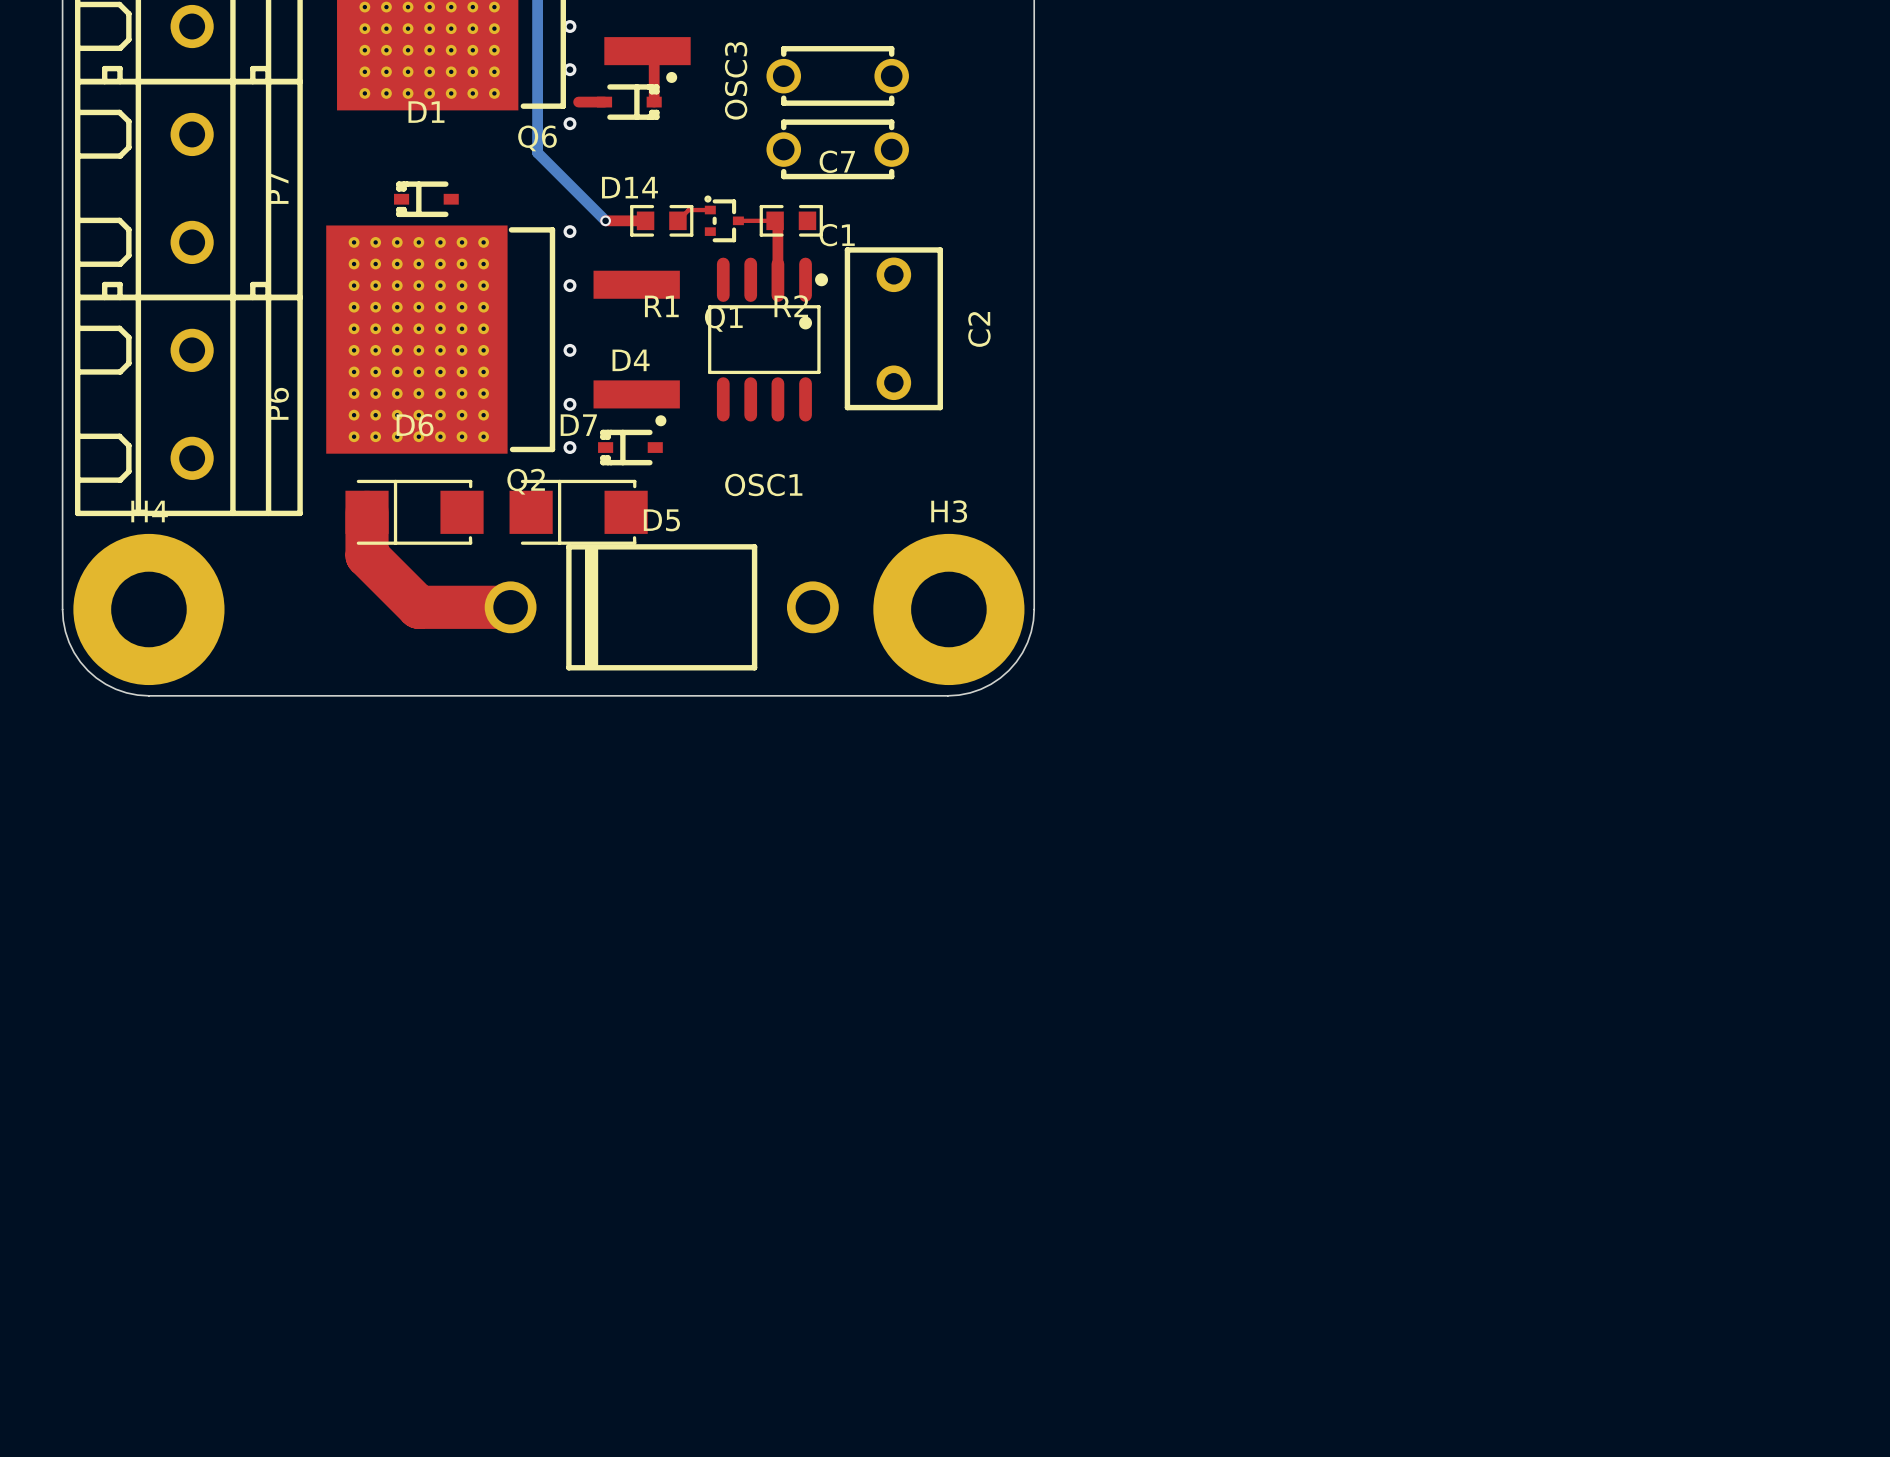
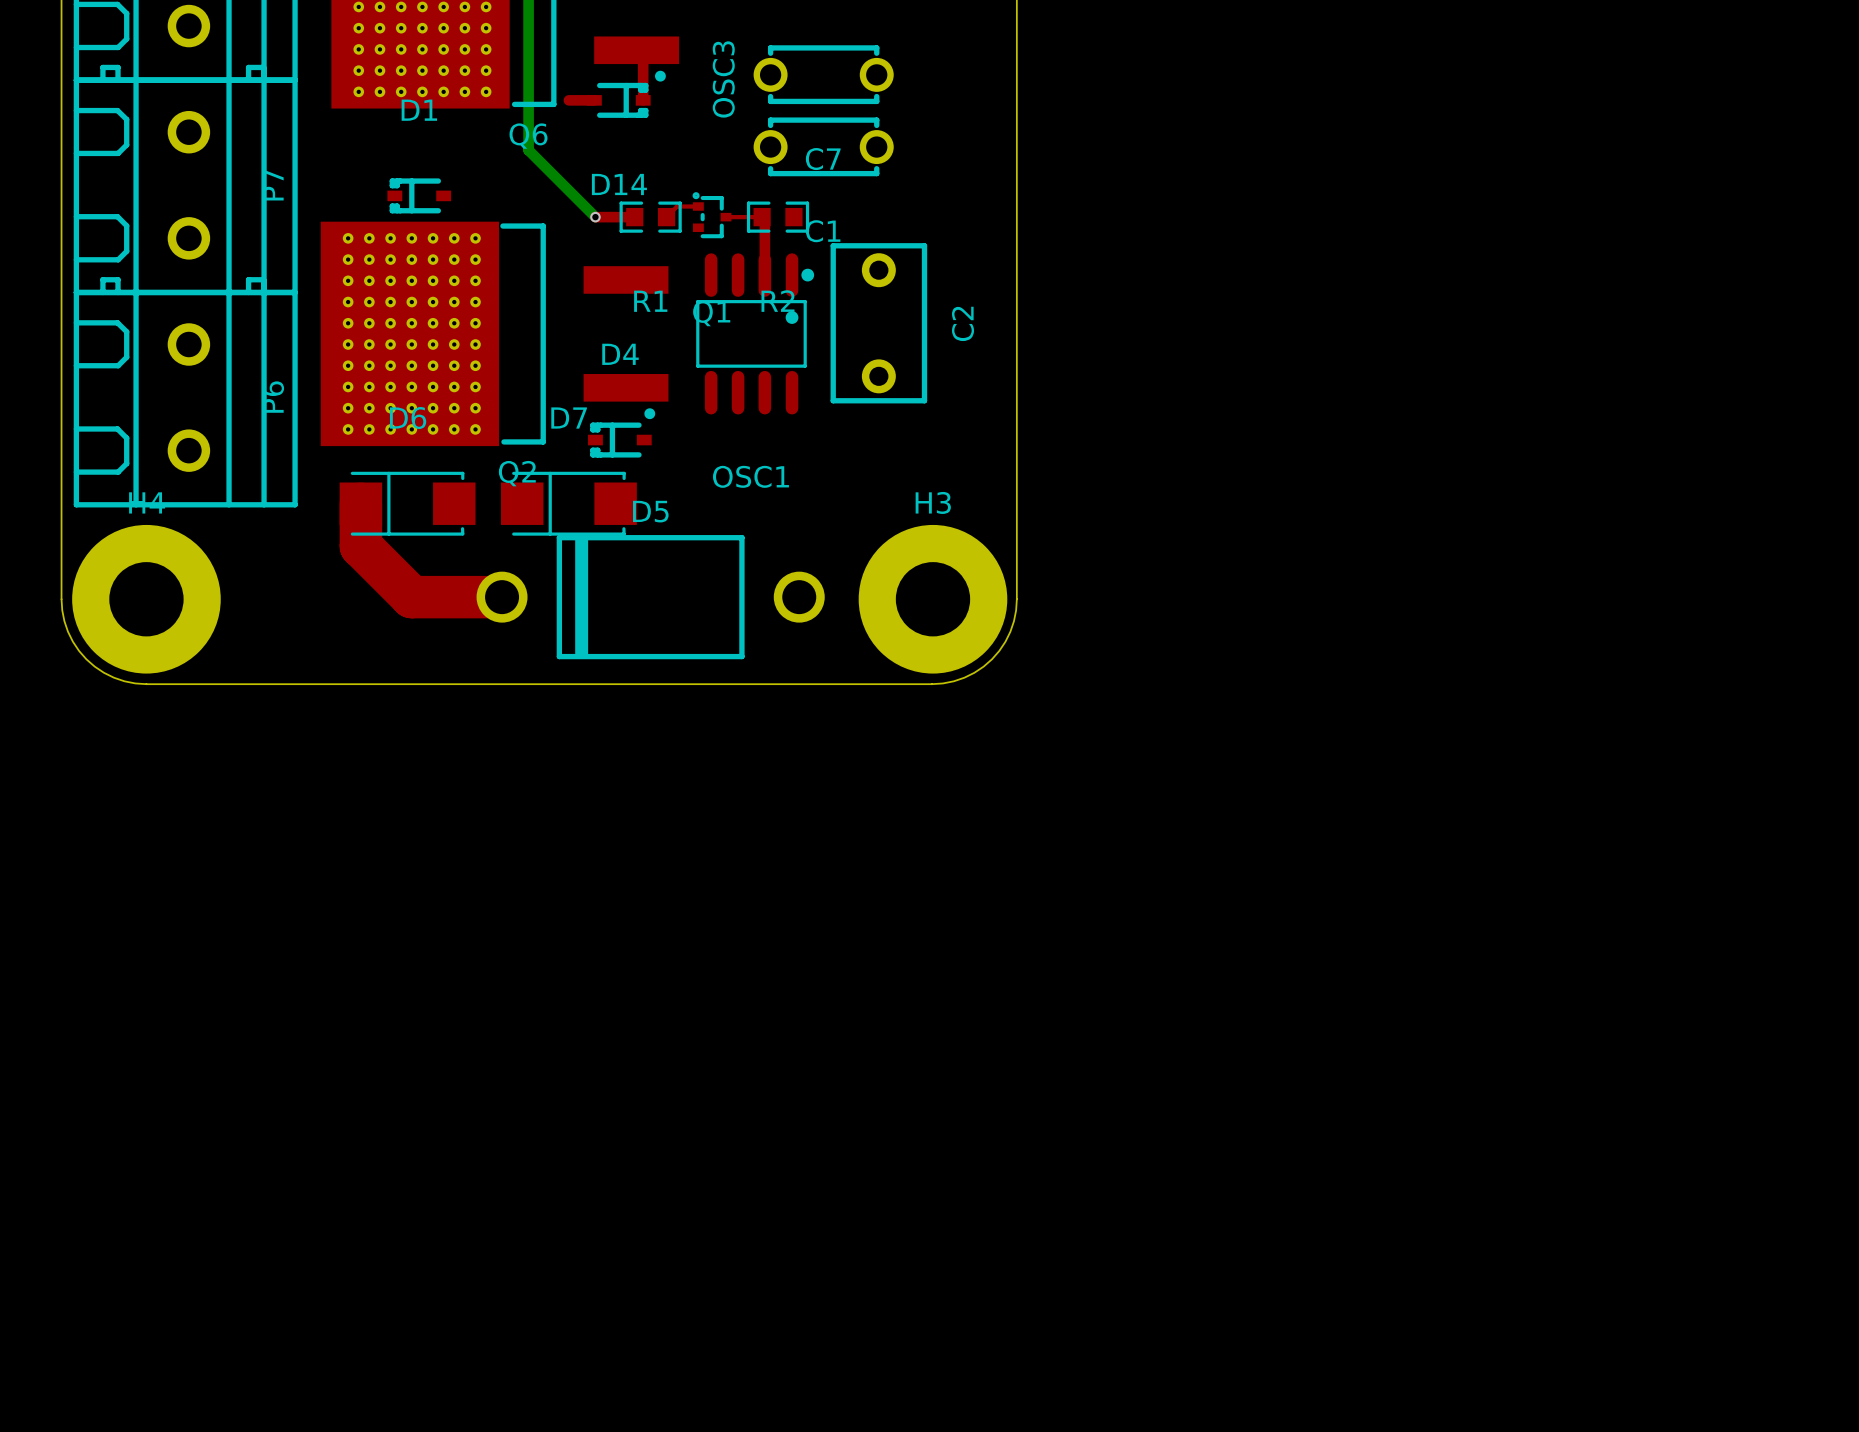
via: (569, 26) -> none
via: (569, 69) -> none
via: (569, 123) -> none
via: (569, 231) -> none
via: (569, 285) -> none
via: (569, 350) -> none
via: (569, 404) -> none
via: (569, 447) -> none

